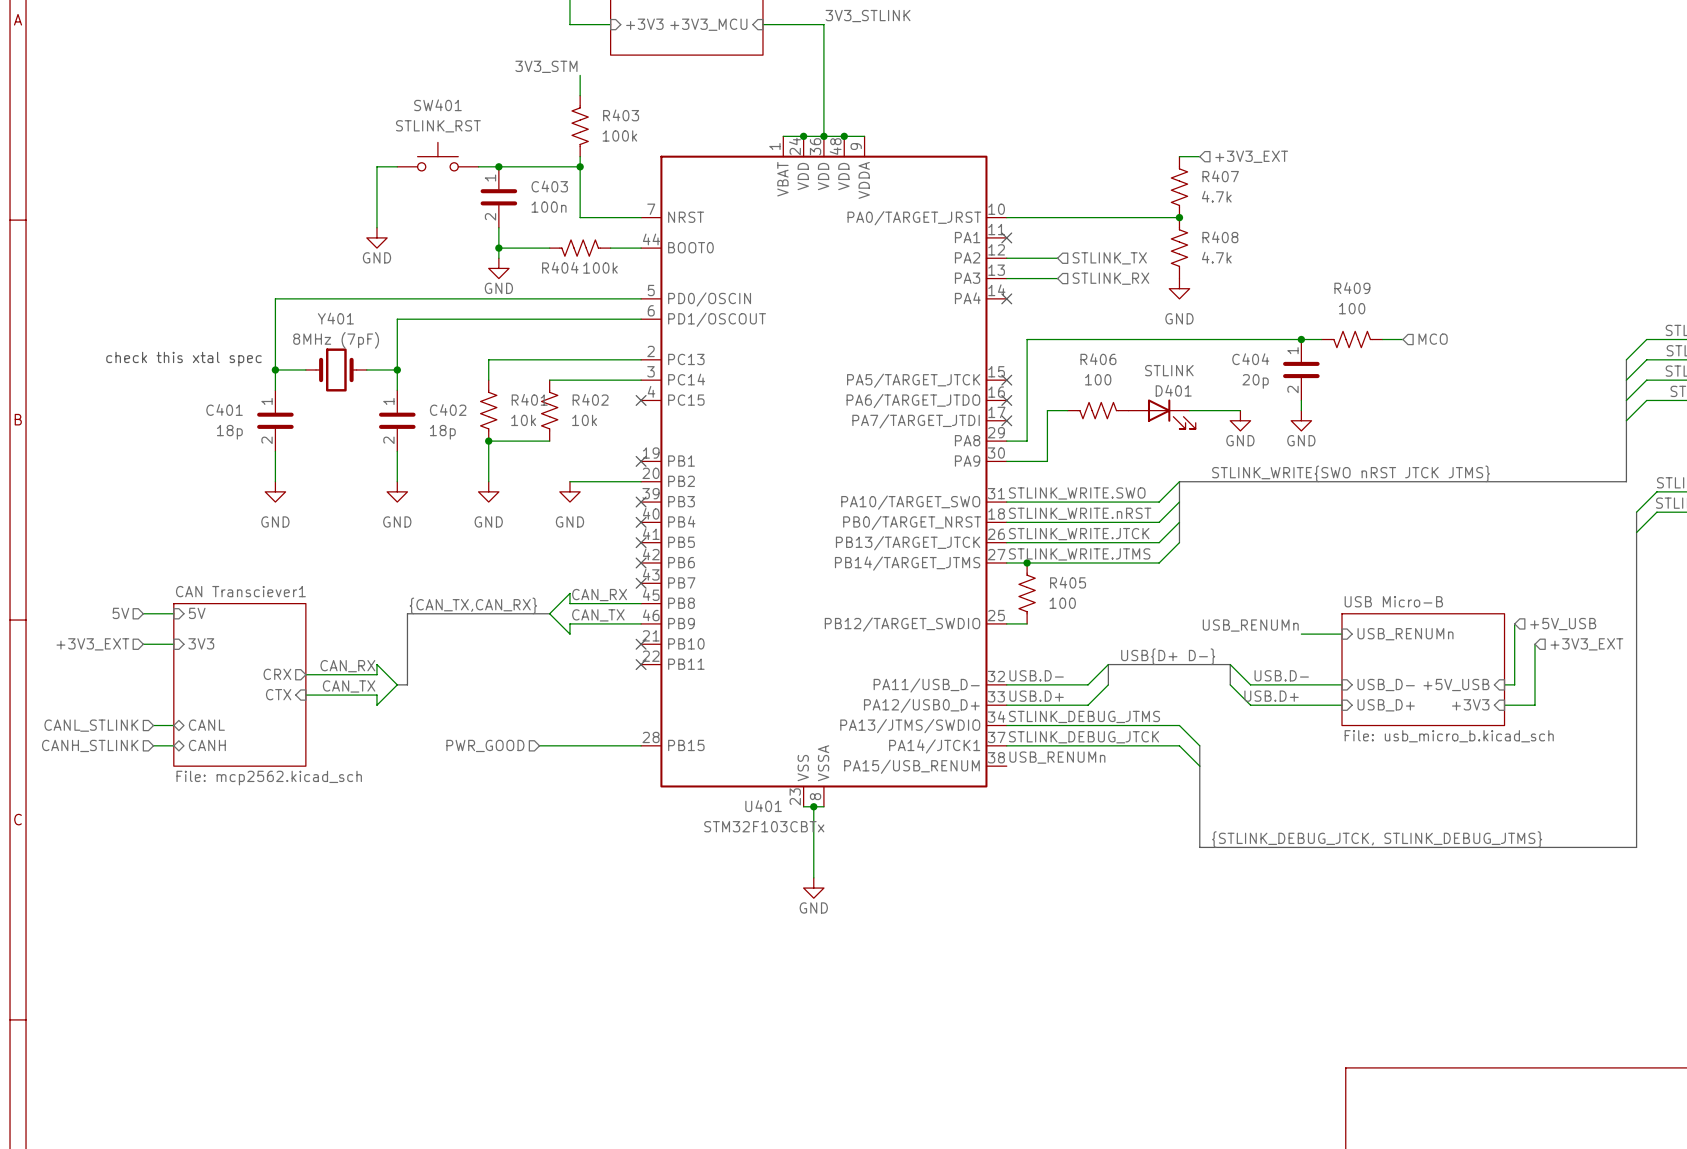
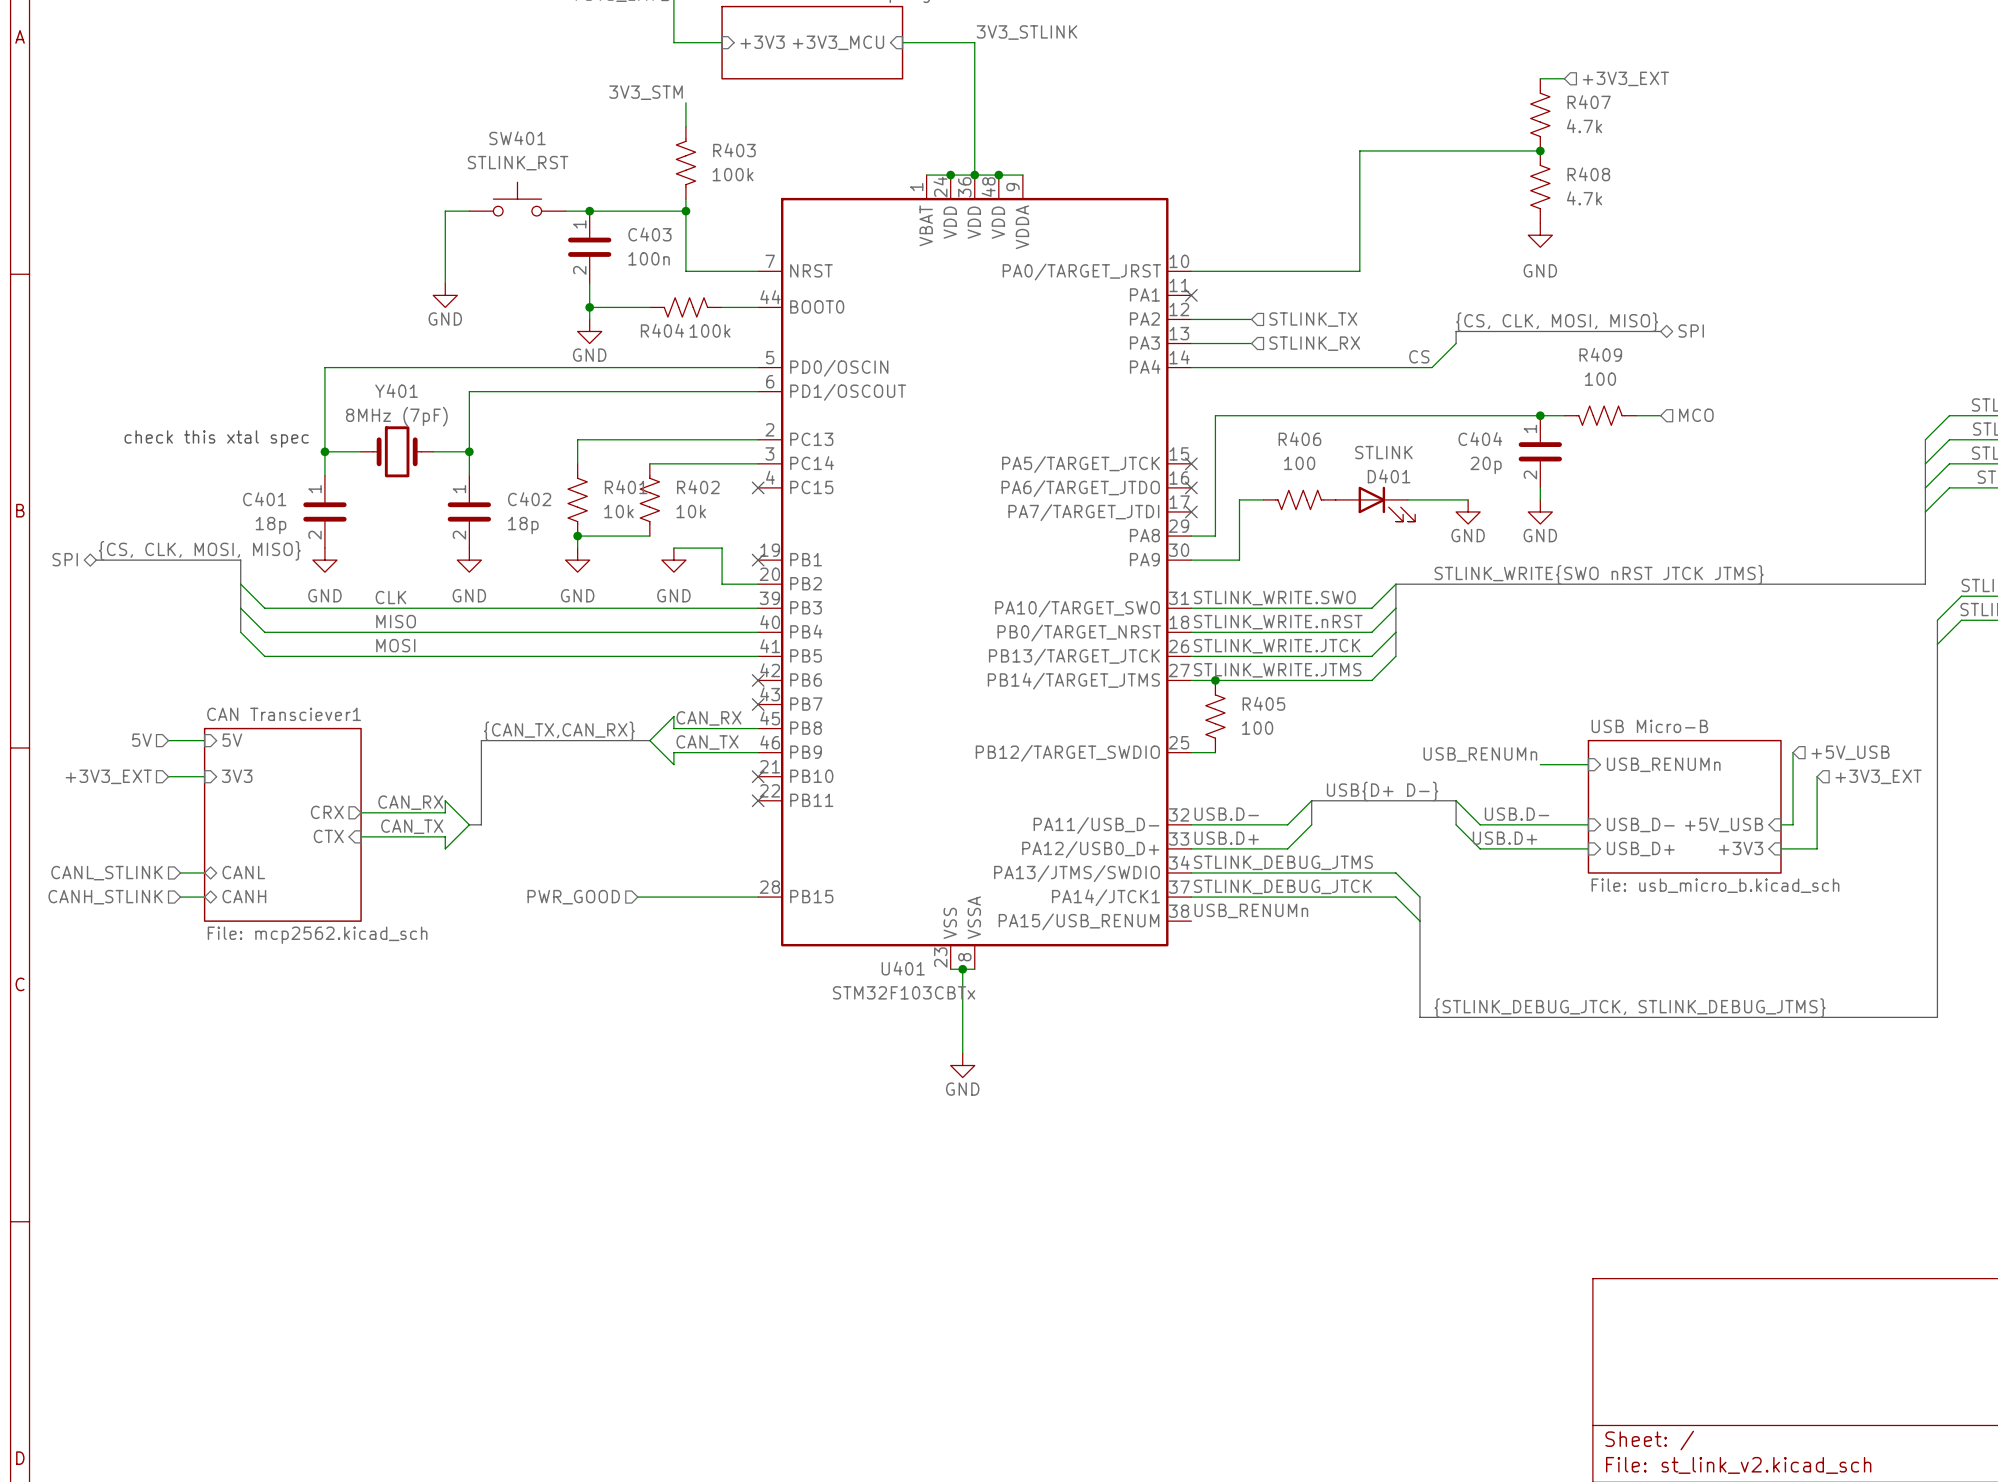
junction: none -> (1540, 150)
wire: (1179, 156) (1199, 156) -> (1540, 78) (1564, 78)
hierarchical label position: +3V3_EXT (1251, 156) -> +3V3_EXT (1625, 78)
R407 position: (1179, 187) -> (1540, 114)
wire: (1148, 217) (1179, 217) -> (1359, 271) (1359, 150) (1540, 150)
junction: (1179, 217) -> none
R408 position: (1179, 248) -> (1540, 187)
label: none -> {CS, CLK, MOSI, MISO} (1557, 322)
bus: none -> (1660, 331) (1456, 331) (1456, 343)
hierarchical label: none -> SPI (1691, 331)
wire: none -> (1456, 343) (1432, 367) (1191, 367)
power symbol position: GND (1179, 288) -> GND (1540, 235)
label: none -> CS (1419, 356)
no-connect mark: (1006, 298) -> none
wire: (275, 451) (275, 481) -> none
wire: (397, 451) (397, 481) -> none
wire: (488, 451) (488, 481) -> none
label: none -> {CS, CLK, MOSI, MISO} (199, 550)
hierarchical label: none -> SPI (65, 559)
bus: none -> (96, 560) (240, 560) (240, 632)
wire: none -> (240, 584) (264, 608) (758, 608)
wire: (569, 481) (610, 481) -> (673, 548) (722, 548) (722, 584)
power symbol position: GND (275, 491) -> GND (324, 560)
power symbol position: GND (397, 491) -> GND (469, 560)
power symbol position: GND (488, 491) -> GND (577, 560)
power symbol position: GND (569, 491) -> GND (673, 560)
label: none -> CLK (390, 597)
wire: none -> (240, 608) (264, 632) (758, 632)
no-connect mark: (641, 502) -> none
label: none -> MISO (396, 621)
wire: none -> (240, 632) (264, 656) (758, 656)
no-connect mark: (641, 522) -> none
label: none -> MOSI (395, 645)
no-connect mark: (641, 542) -> none

